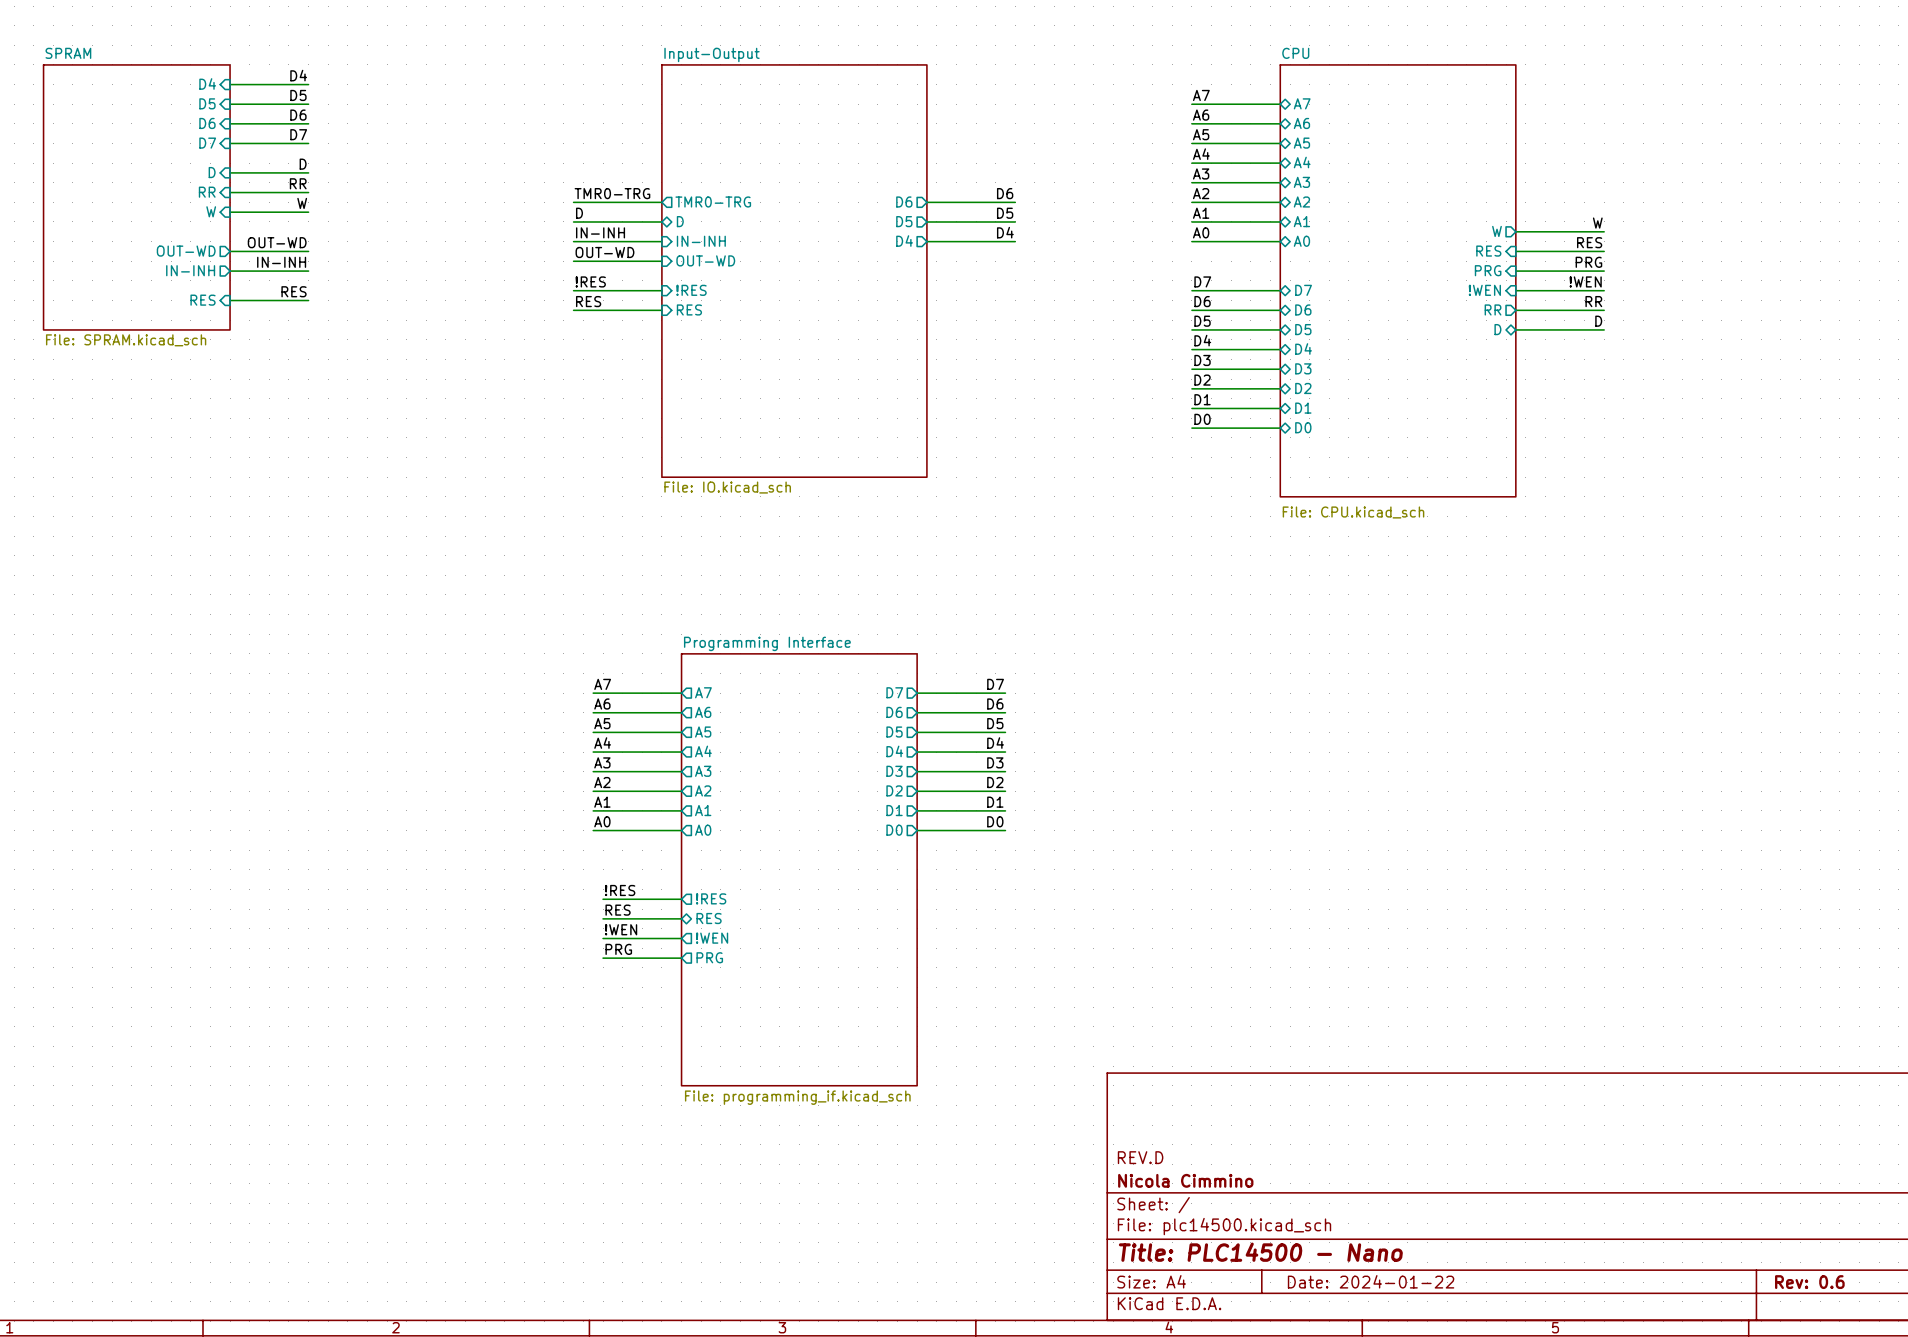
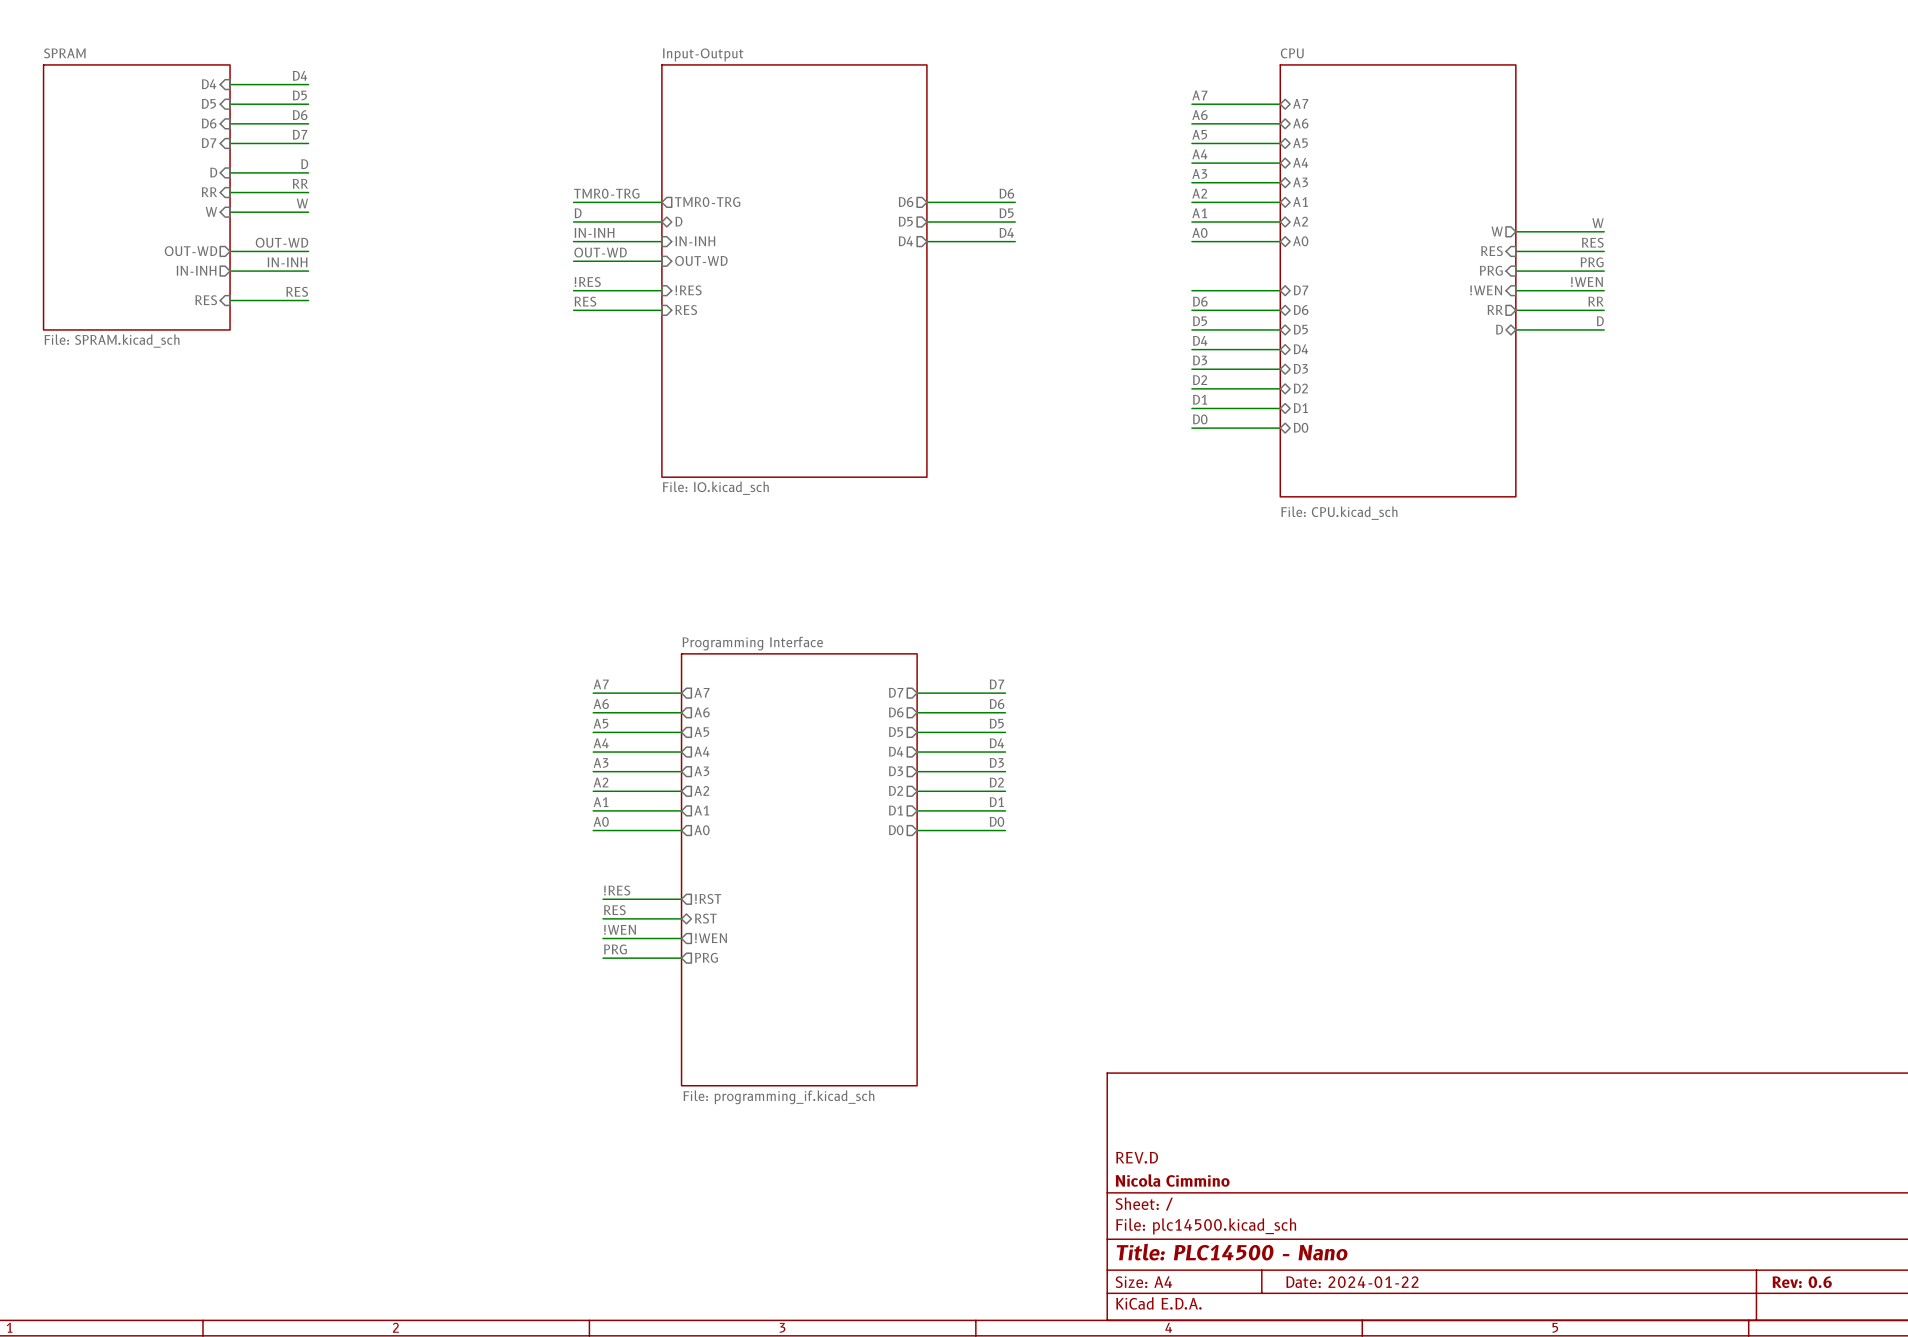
sheet pin: A2 (1301, 202) -> A1 (1300, 202)
sheet pin: A1 (1301, 221) -> A2 (1300, 221)
label: D7 (1202, 281) -> none
sheet pin: !RES (711, 898) -> !RST (708, 898)
sheet pin: RES (709, 918) -> RST (705, 918)

